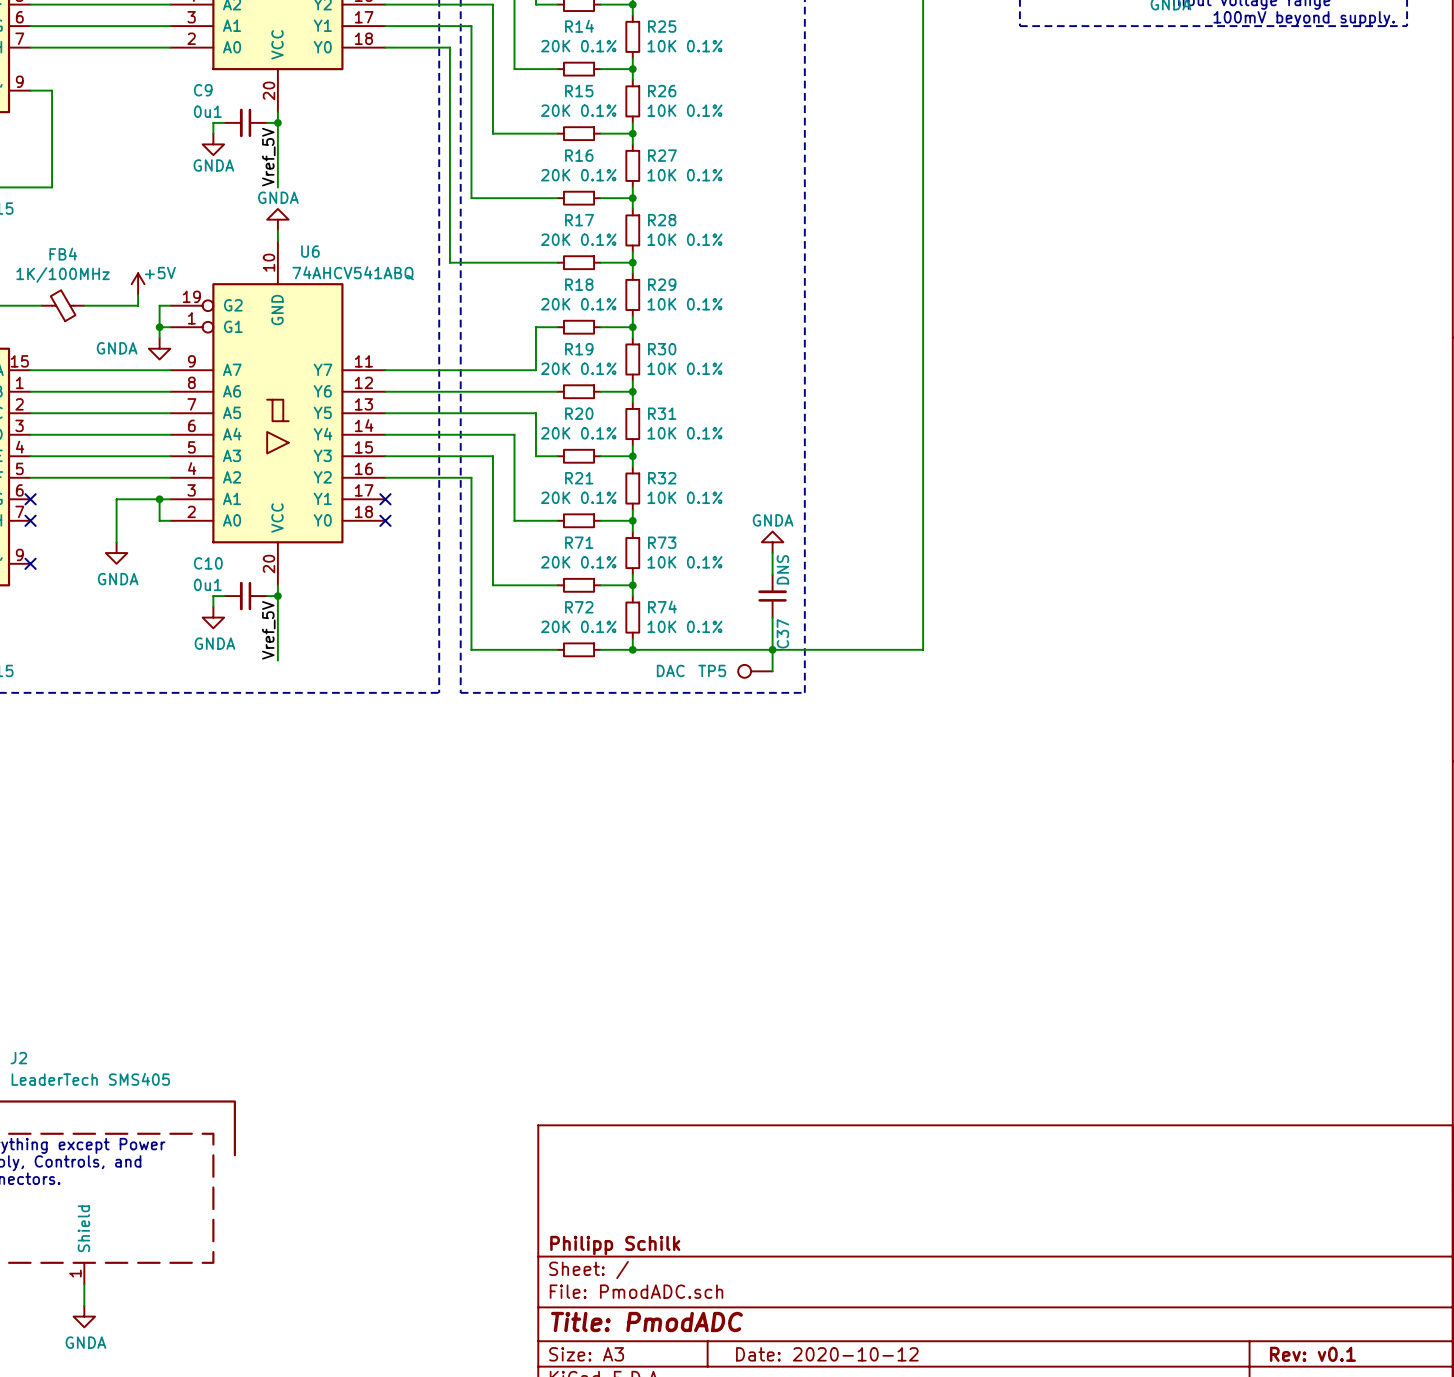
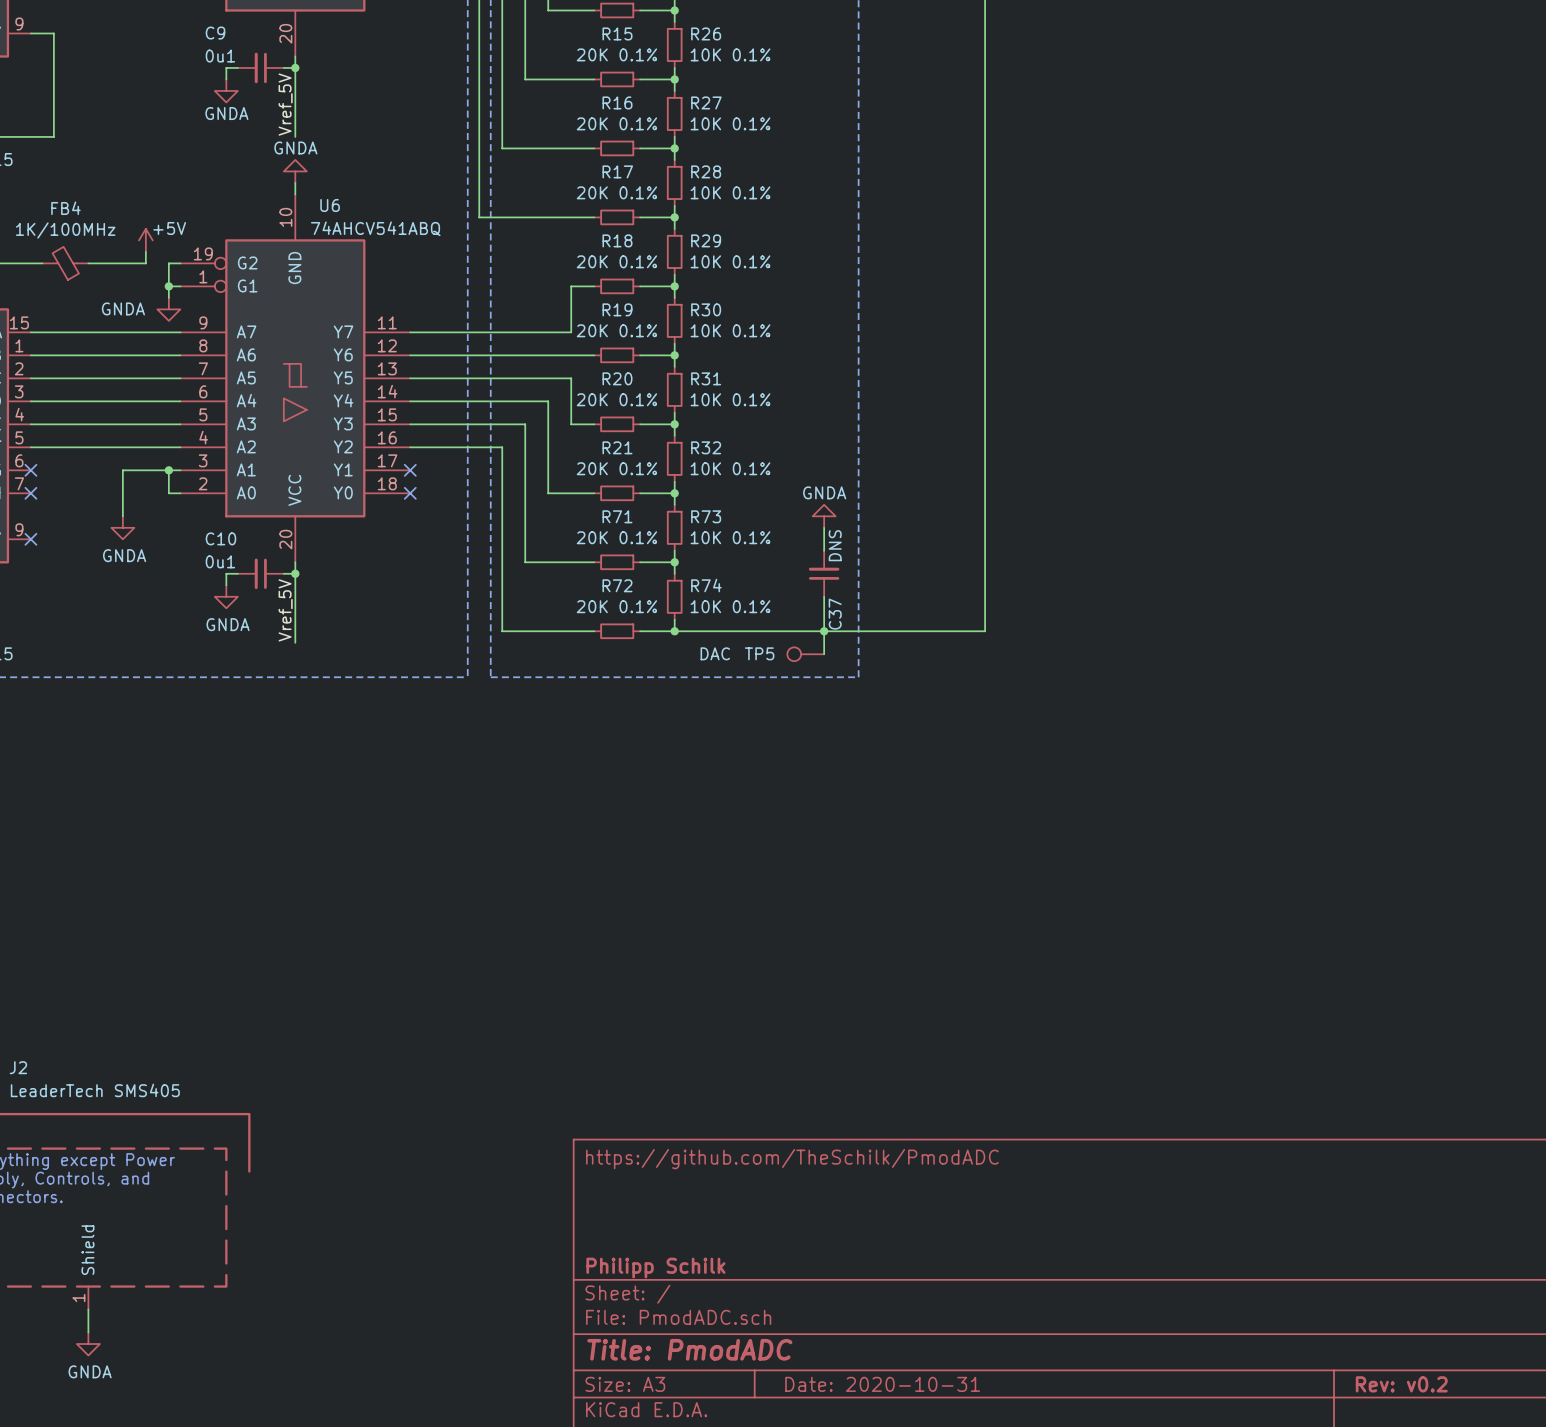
title block: none -> https://github.com/TheSchilk/PmodADC (792, 1159)
title block: Date: 2020-10-12 (827, 1354) -> Date: 2020-10-31 (882, 1384)
title block: Rev: v0.1 (1312, 1354) -> Rev: v0.2 (1401, 1384)

